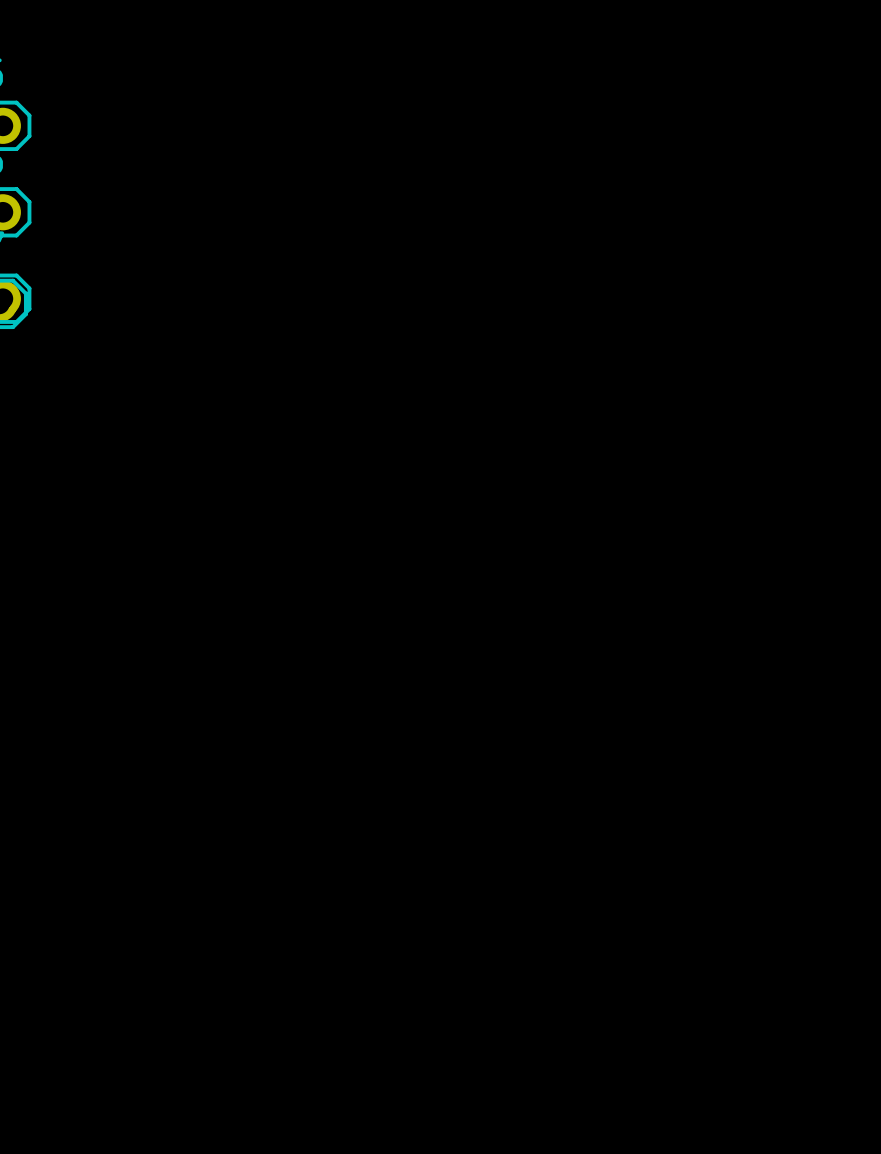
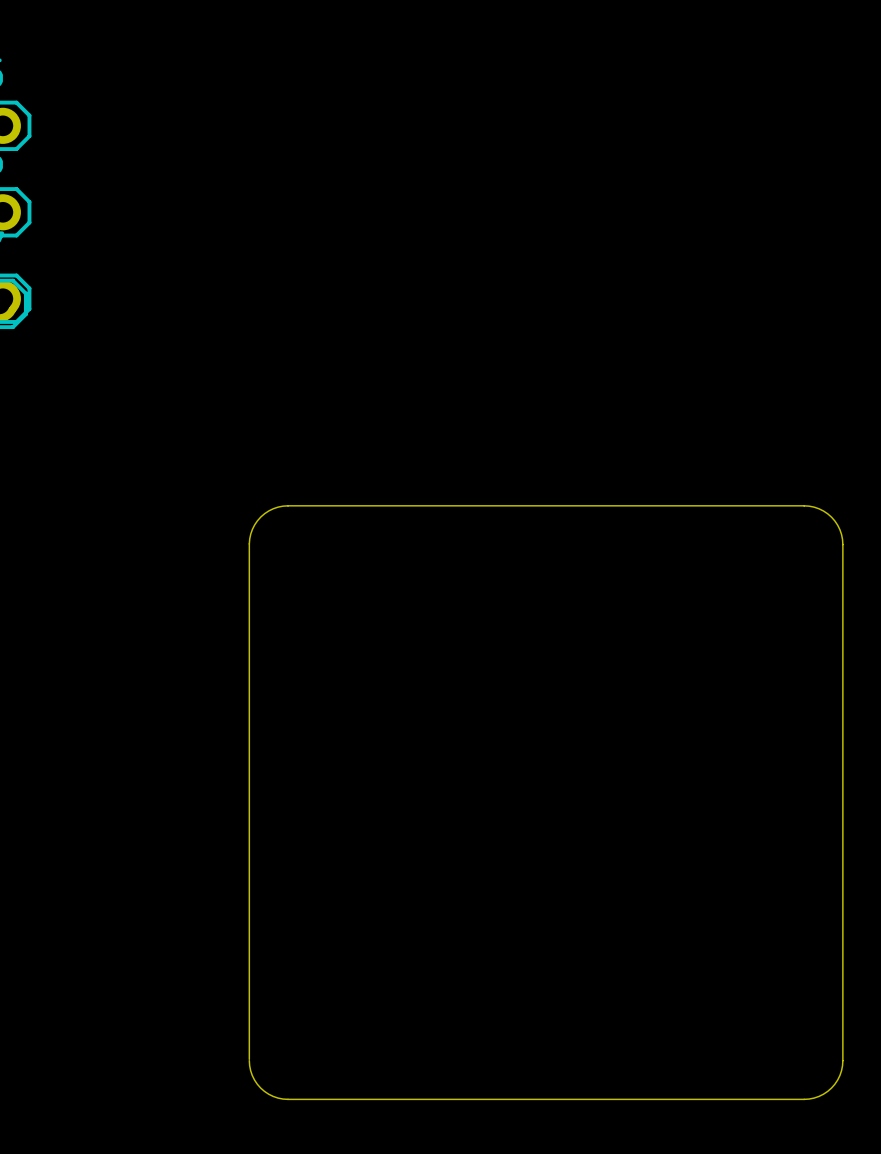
board edge: none -> (249, 1059) (249, 543) (252, 529) (260, 516) (273, 508) (288, 505) (804, 505) (818, 508) (831, 517) (839, 529) (842, 544) (842, 1060) (839, 1075) (831, 1088) (818, 1096) (804, 1099) (288, 1099) (273, 1096) (260, 1088) (252, 1075) (249, 1060)

